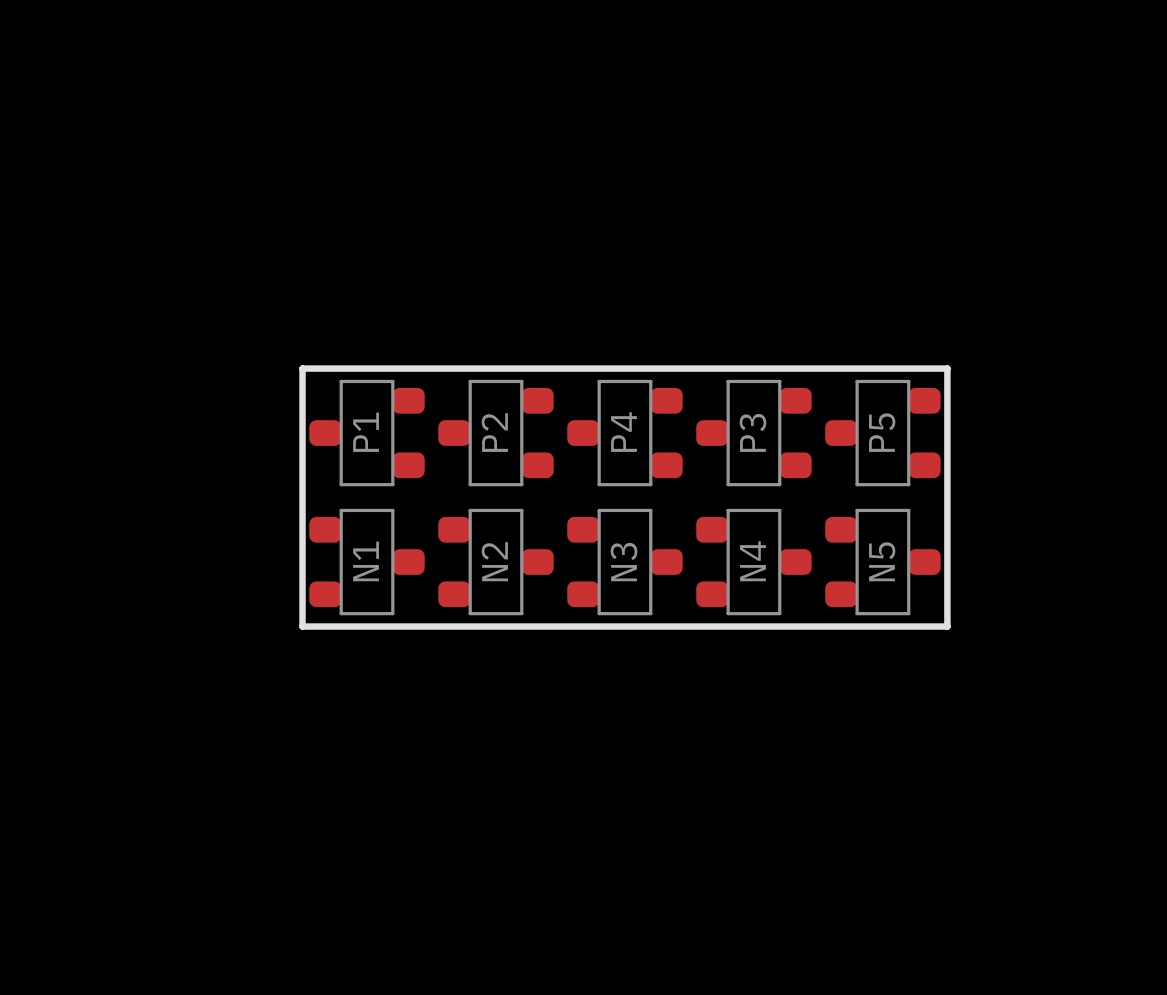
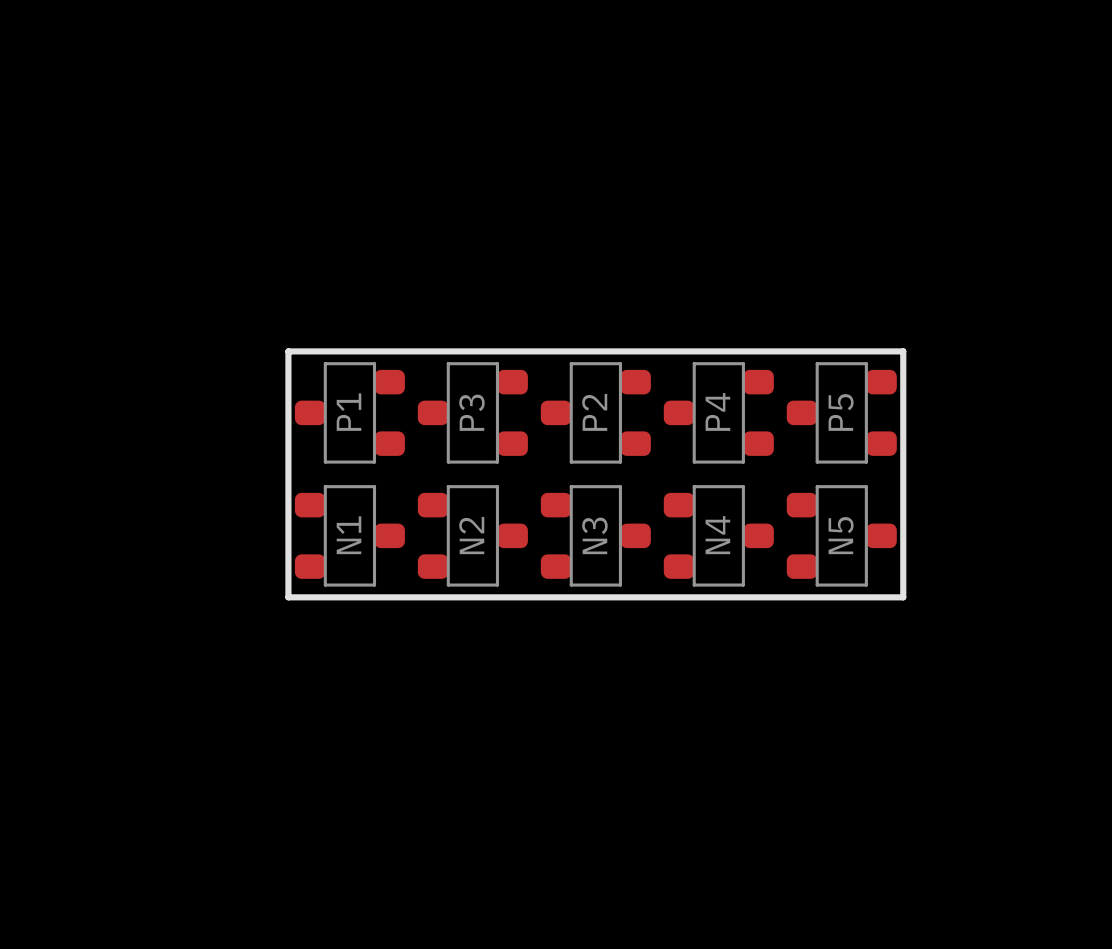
P2 name: P2 (494, 432) -> P3 (471, 412)
P4 name: P4 (624, 432) -> P2 (594, 412)
P3 name: P3 (752, 432) -> P4 (717, 411)

